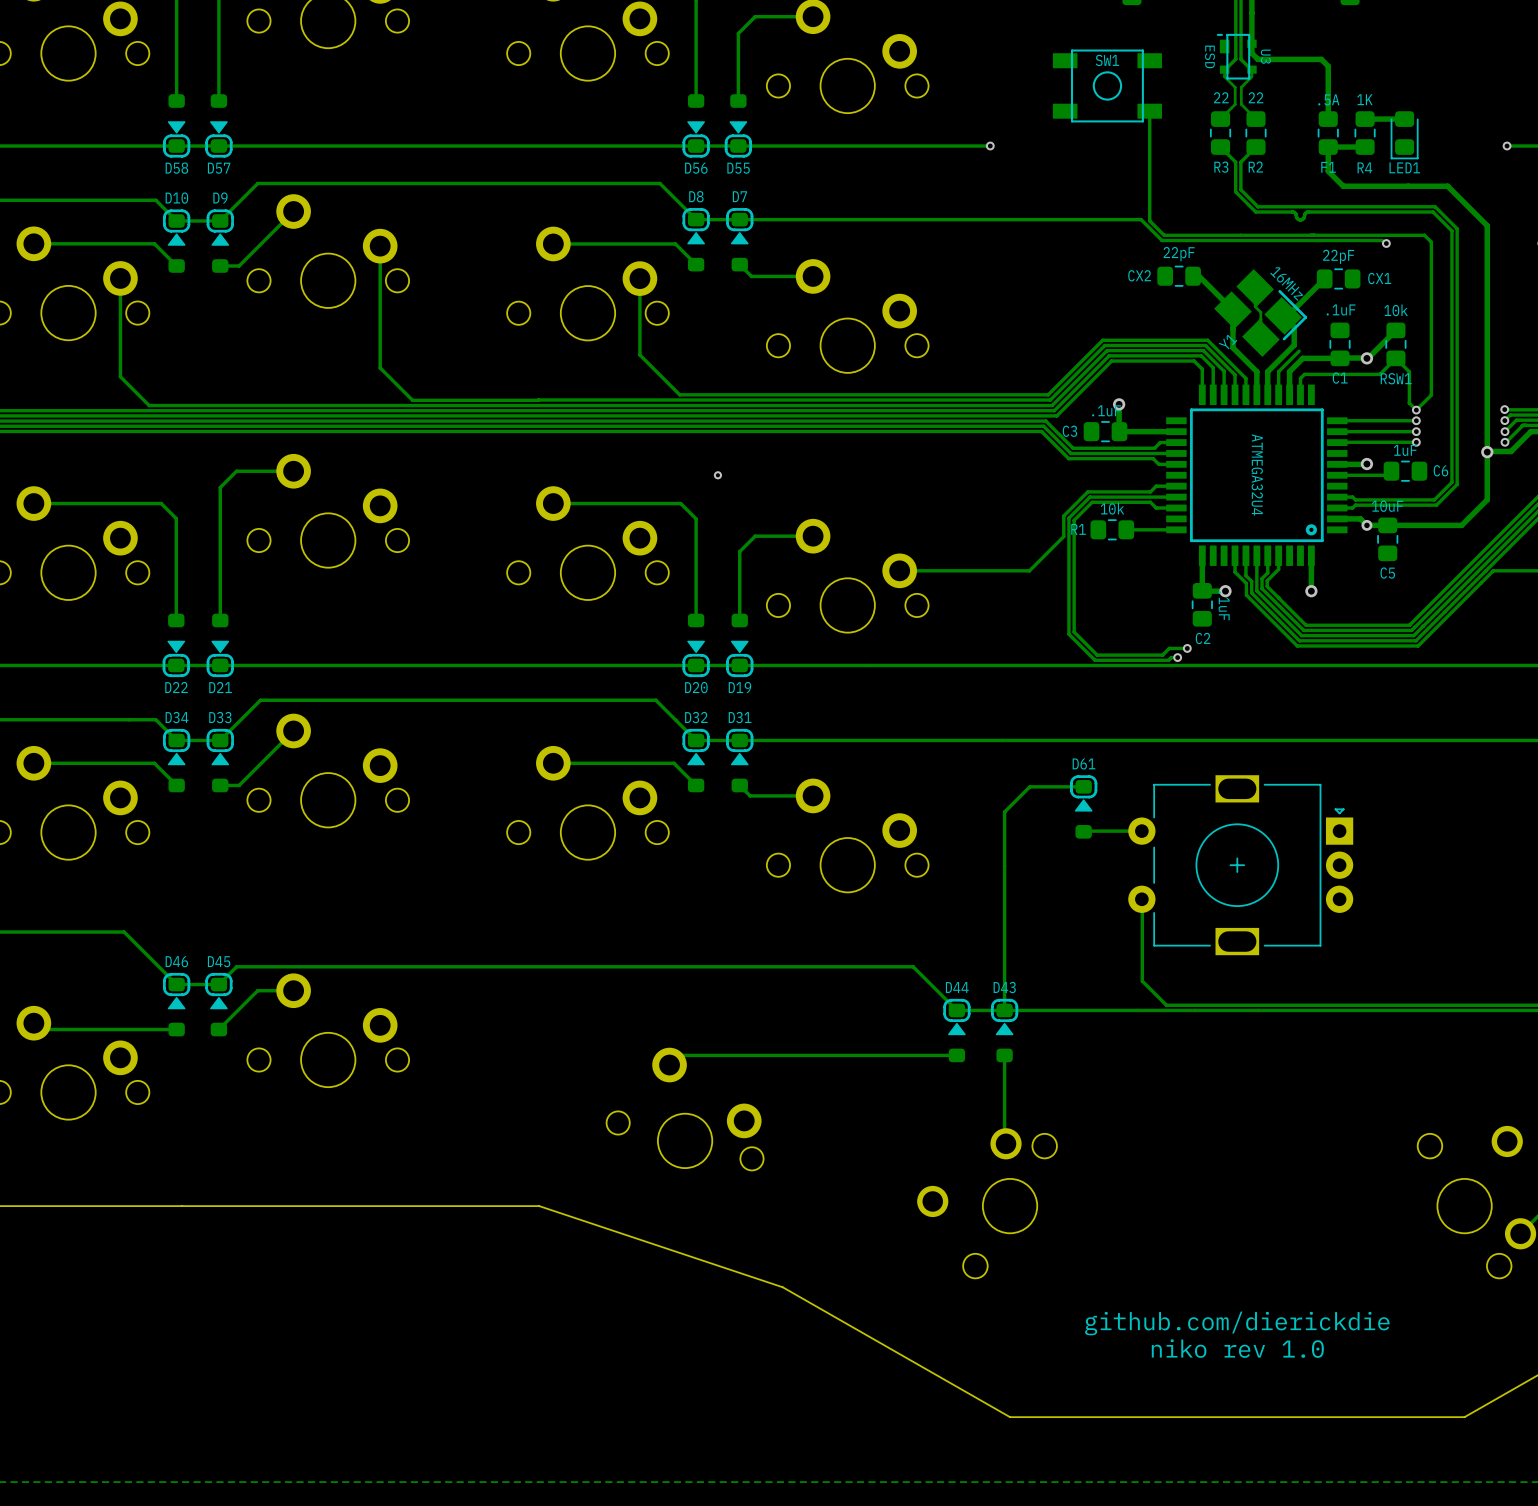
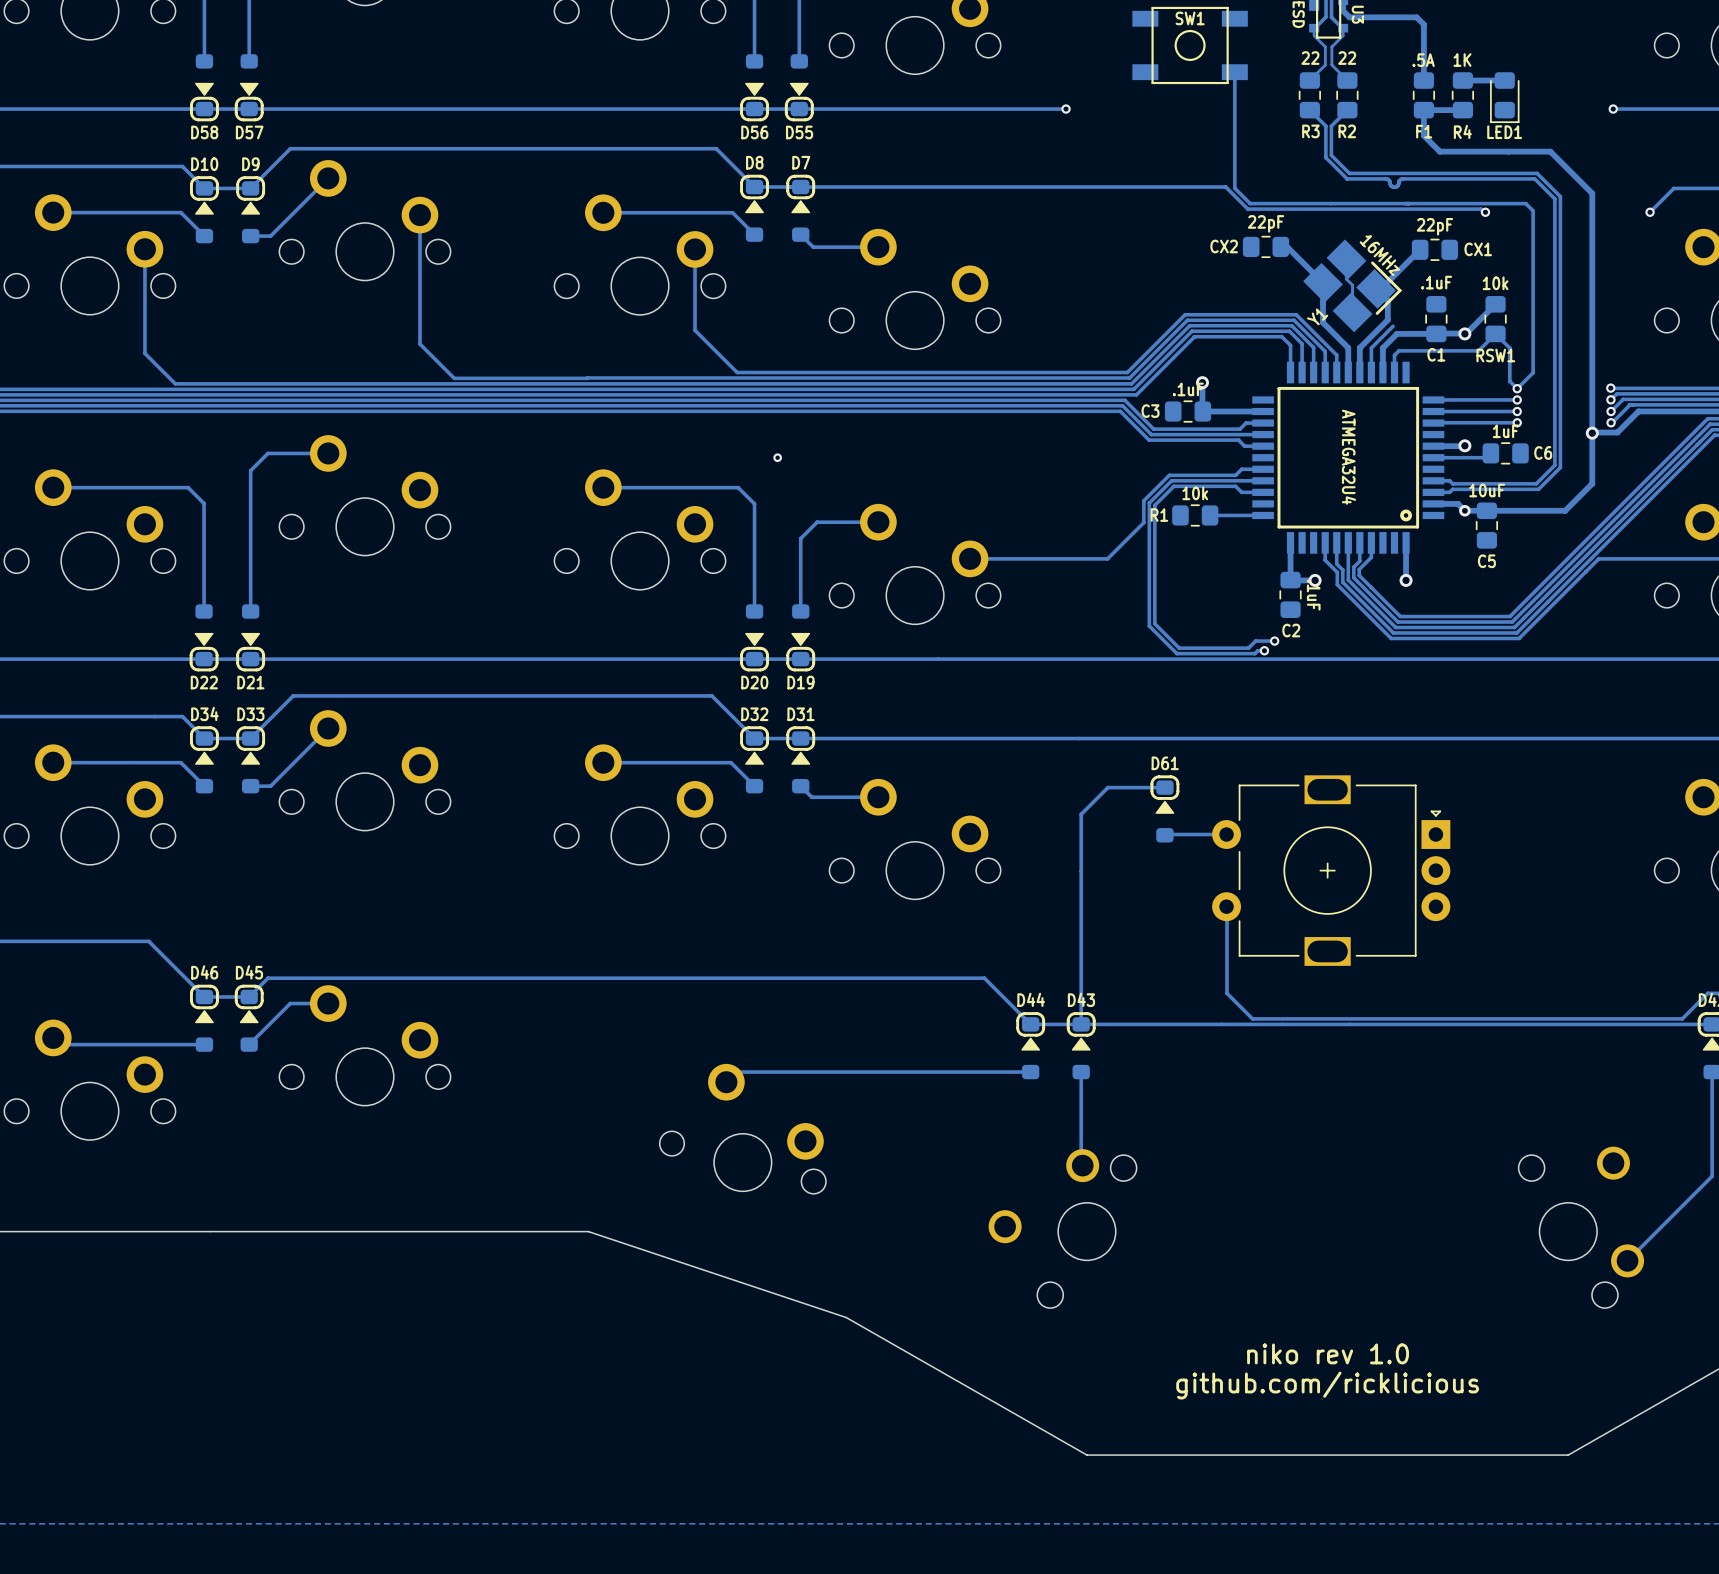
text: github.com/dierickdie (1237, 1323) -> niko rev 1.0 (1328, 1353)
text: niko rev 1.0 (1237, 1348) -> github.com/ricklicious (1327, 1385)

